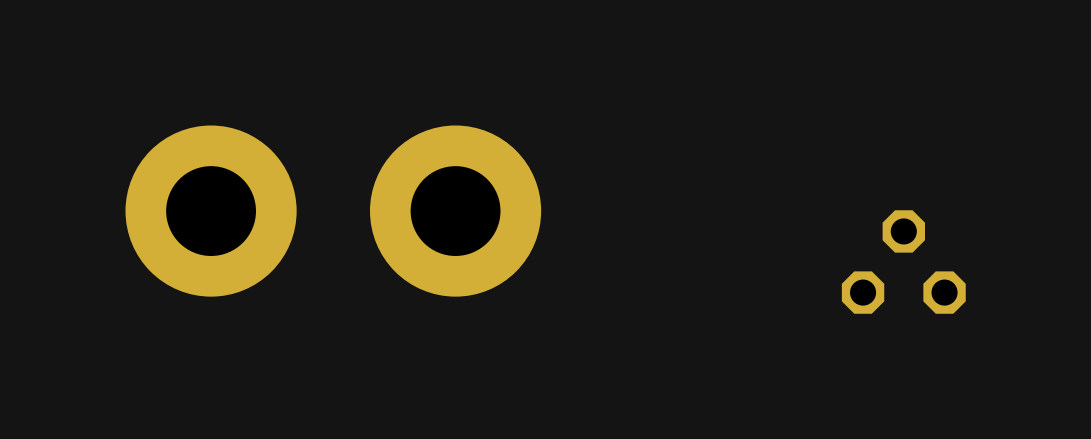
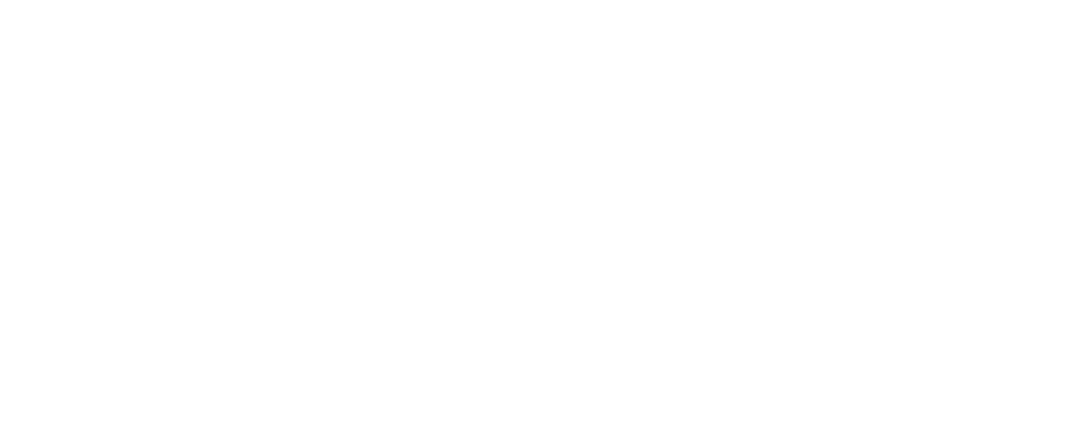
part: (211, 211) -> none
part: (455, 211) -> none
part: (903, 262) -> none

